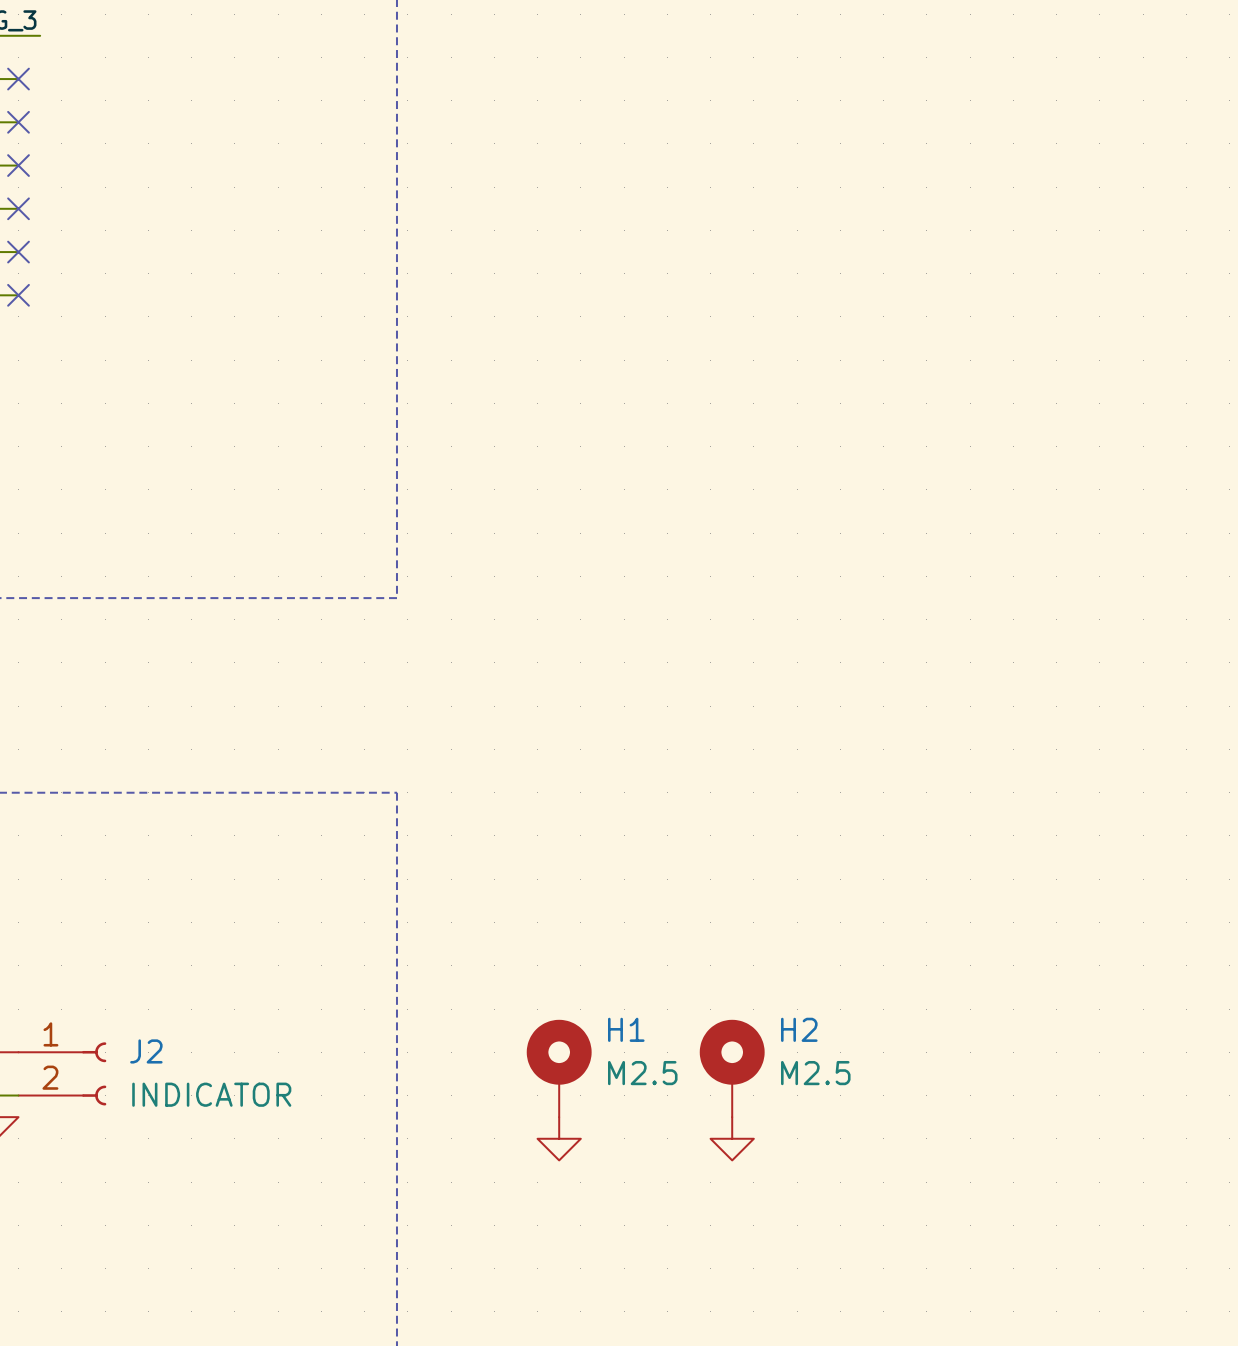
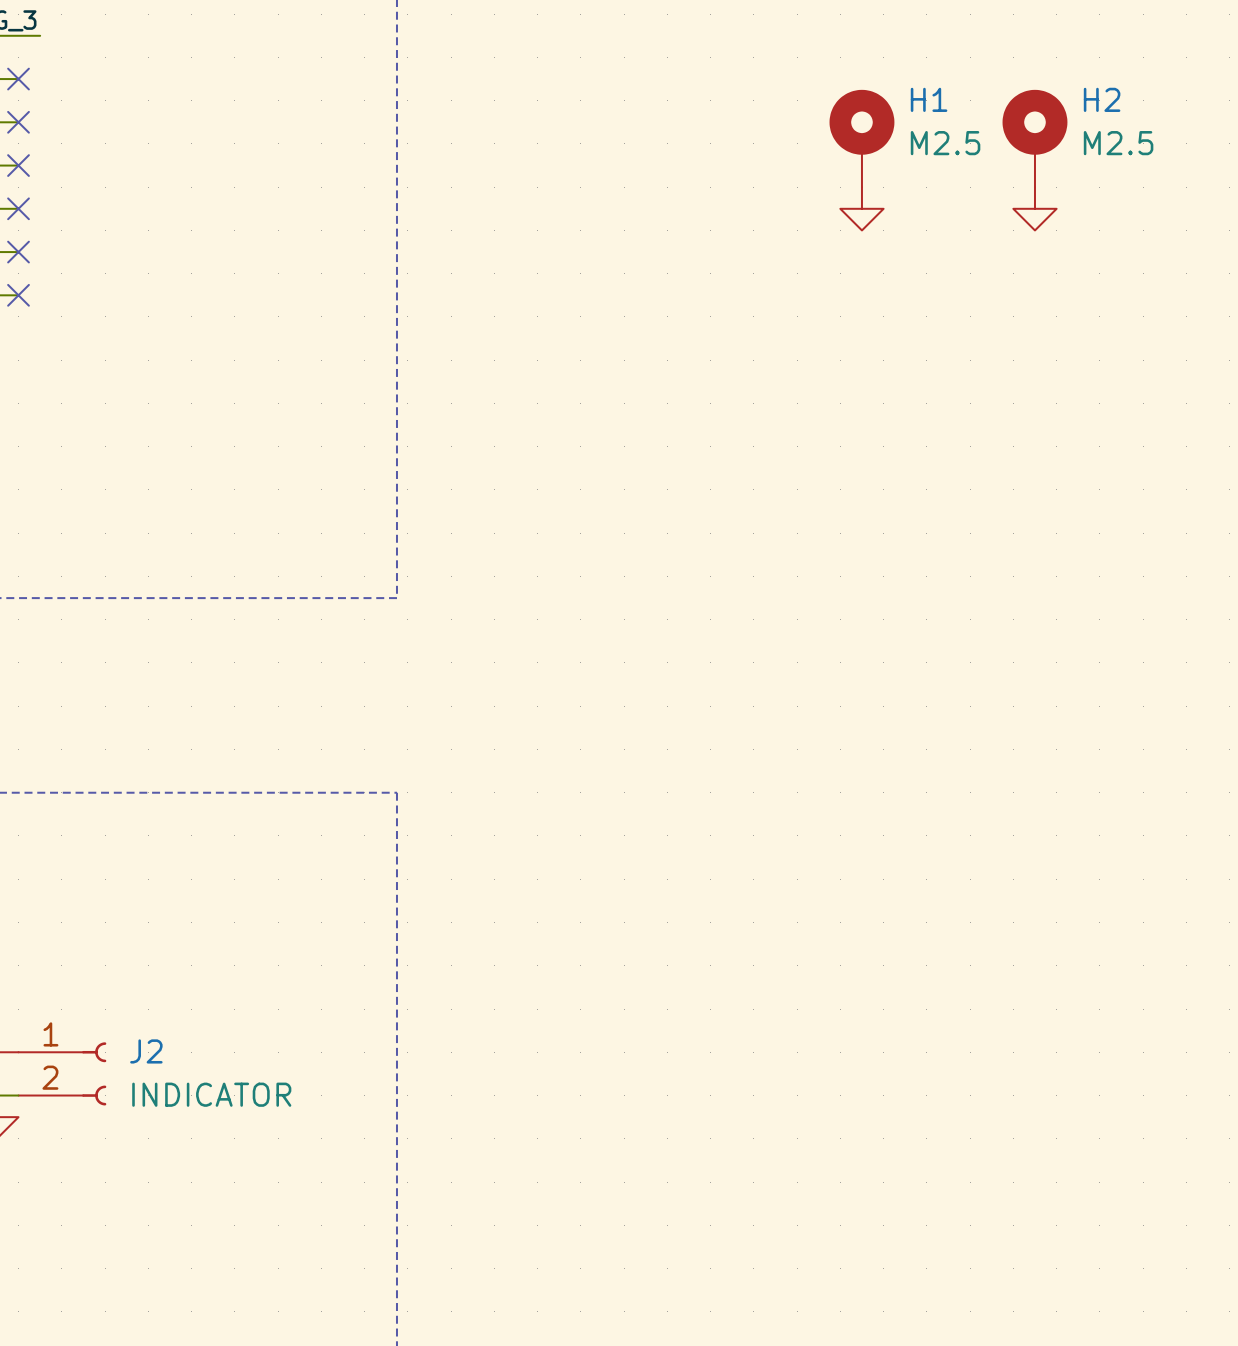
power symbol: none -> (861, 208)
power symbol: none -> (1034, 208)
H1 position: (559, 1068) -> (861, 138)
H2 position: (732, 1068) -> (1034, 138)
power symbol: (559, 1138) -> none
power symbol: (732, 1138) -> none

